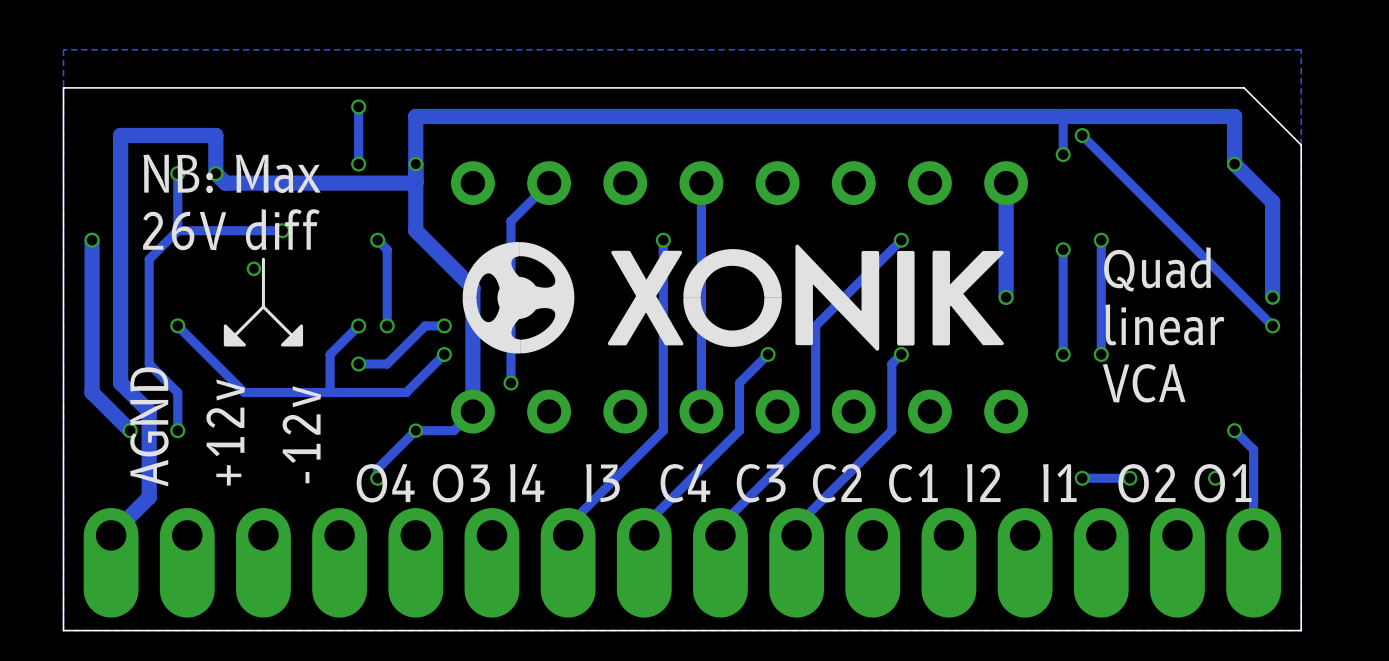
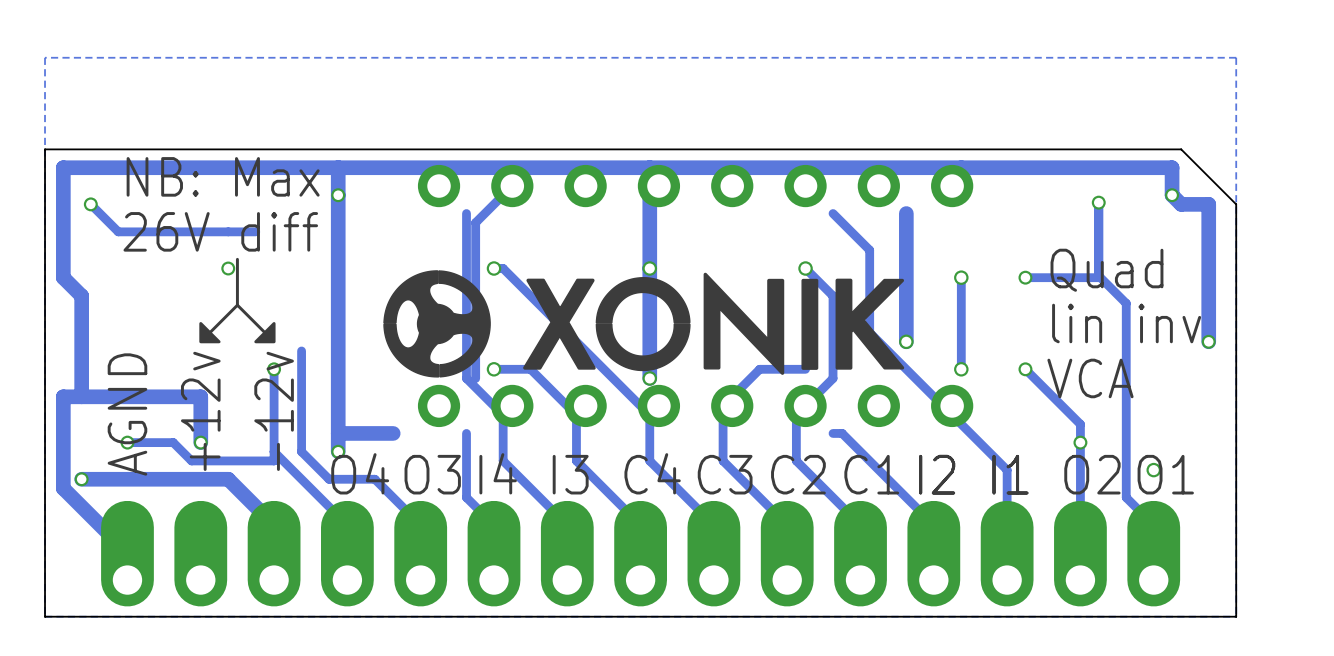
track: (358, 106) (358, 164) -> none
via: (358, 106) -> none
track: (1063, 116) (1063, 154) -> none
track: (1082, 135) (1272, 325) -> none
via: (1082, 135) -> none
board edge: (63, 145) (63, 87) (1244, 87) (1301, 145) (1301, 202) -> (45, 149) (1181, 149) (1236, 204)
via: (1063, 154) -> none
via: (358, 164) -> none
track: none -> (338, 167) (338, 451)
via position: (415, 164) -> (338, 195)
track: none -> (649, 167) (649, 378)
via: (1234, 164) -> none
track: (177, 173) (177, 230) (149, 259) (149, 364) (177, 392) (177, 430) -> none
via: (177, 173) -> none
via: (215, 173) -> none
track: (415, 183) (225, 183) (215, 173) (215, 135) (120, 135) (120, 383) (149, 411) (149, 497) (111, 535) -> none
track: (701, 183) (701, 411) -> none
track: (1006, 183) (1006, 297) -> none
via: none -> (1172, 195)
track: none -> (1098, 202) (1098, 277) (1025, 277)
via: none -> (1098, 202)
track: none -> (90, 204) (118, 231) (154, 231)
via: none -> (90, 204)
track: (1272, 202) (1234, 164) (1234, 116) (415, 116) (415, 230) (472, 287) (472, 411) (453, 430) (415, 430) (377, 468) (377, 478) -> (1208, 204) (1181, 204) (1172, 195) (1172, 167) (63, 167) (63, 277) (81, 296) (81, 396)
track: none -> (466, 213) (466, 378) (503, 415) (503, 460) (567, 525) (567, 580)
track: none -> (833, 213) (869, 250) (869, 332) (1007, 470) (1007, 580)
track: none -> (906, 213) (906, 341)
via: (282, 230) -> none
track: (92, 240) (92, 392) (130, 430) -> none
via: (92, 240) -> none
track: (377, 240) (387, 249) (387, 325) -> none
via: (377, 240) -> none
track: (663, 240) (663, 430) (568, 525) (568, 535) -> none
via position: (663, 240) -> (649, 268)
track: (901, 240) (815, 325) (815, 430) (720, 525) (720, 535) -> none
via: (901, 240) -> none
track: (1101, 240) (1101, 354) -> none
via: (1101, 240) -> none
track: (1063, 249) (1063, 354) -> none
via: (1063, 249) -> none
track: none -> (494, 268) (503, 268) (649, 415) (649, 460) (713, 525) (713, 580)
via: none -> (494, 268)
track: none -> (805, 268) (833, 296) (833, 378) (796, 415) (796, 460) (860, 525) (860, 580)
via: none -> (805, 268)
track: none -> (1098, 275) (1126, 303) (1126, 497) (1153, 525) (1153, 580)
track: none -> (961, 277) (961, 369)
via: none -> (1025, 277)
drawing position: (733, 297) -> (643, 323)
via position: (1006, 297) -> (961, 277)
track: none -> (1208, 296) (1208, 341)
via position: (1272, 297) -> (1208, 341)
text: linear (1164, 324) -> lin inv (1126, 323)
track: (177, 325) (244, 392) (406, 392) (444, 354) -> none
via: (177, 325) -> none
track: (358, 325) (330, 354) -> none
via: (358, 325) -> none
via: (387, 325) -> none
track: (444, 325) (425, 325) (387, 364) (358, 364) -> none
via: (444, 325) -> none
via: (1272, 325) -> none
via: none -> (906, 341)
via: (444, 354) -> none
track: (768, 354) (739, 383) (739, 430) (644, 525) (644, 535) -> none
via: (768, 354) -> none
track: (901, 354) (891, 364) (891, 430) (796, 525) (796, 535) -> none
via: (901, 354) -> none
via: (1063, 354) -> none
via: (1101, 354) -> none
via: (358, 364) -> none
track: none -> (274, 369) (274, 460) (191, 460) (173, 442) (127, 442)
via: none -> (274, 369)
track: none -> (494, 369) (530, 369) (576, 415) (576, 460) (640, 525) (640, 580)
track: none -> (805, 369) (759, 369) (723, 405) (723, 460) (787, 525) (787, 580)
via: none -> (961, 369)
track: none -> (1025, 369) (1080, 424) (1080, 580)
via: none -> (1025, 369)
via position: (510, 383) -> (494, 369)
via: none -> (649, 378)
track: none -> (301, 387) (301, 451) (329, 479) (374, 479) (420, 525) (420, 580)
via: (130, 430) -> none
via: (177, 430) -> none
via position: (415, 430) -> (338, 451)
track: (1234, 430) (1253, 449) (1253, 535) -> none
via: (1234, 430) -> none
track: none -> (393, 433) (338, 433)
track: none -> (466, 433) (466, 497) (494, 525) (494, 580)
track: none -> (833, 433) (842, 433) (933, 525) (933, 580)
via: none -> (127, 442)
track: none -> (200, 442) (200, 396) (63, 396) (63, 488) (127, 552) (127, 580)
via: none -> (200, 442)
via: none -> (1080, 442)
track: none -> (274, 451) (347, 525) (347, 580)
via: (377, 478) -> none
via: (1082, 478) -> none
track: (1129, 478) (1082, 478) -> none
via: (1129, 478) -> none
track: none -> (81, 479) (228, 479) (274, 525) (274, 580)
via: none -> (81, 479)
part: (111, 562) -> none
part: (187, 562) -> none
part: (263, 562) -> none
part: (339, 562) -> none
part: (415, 562) -> none
part: (491, 562) -> none
part: (568, 562) -> none
part: (644, 562) -> none
part: (720, 562) -> none
part: (796, 562) -> none
part: (872, 562) -> none
part: (948, 562) -> none
part: (1025, 562) -> none
part: (1101, 562) -> none
part: (1177, 562) -> none
part: (1253, 562) -> none
part: none -> (127, 553)
part: none -> (200, 553)
part: none -> (274, 553)
part: none -> (347, 553)
part: none -> (420, 553)
part: none -> (494, 553)
part: none -> (567, 553)
part: none -> (640, 553)
part: none -> (713, 553)
part: none -> (787, 553)
part: none -> (860, 553)
part: none -> (933, 553)
part: none -> (1007, 553)
part: none -> (1080, 553)
part: none -> (1153, 553)

